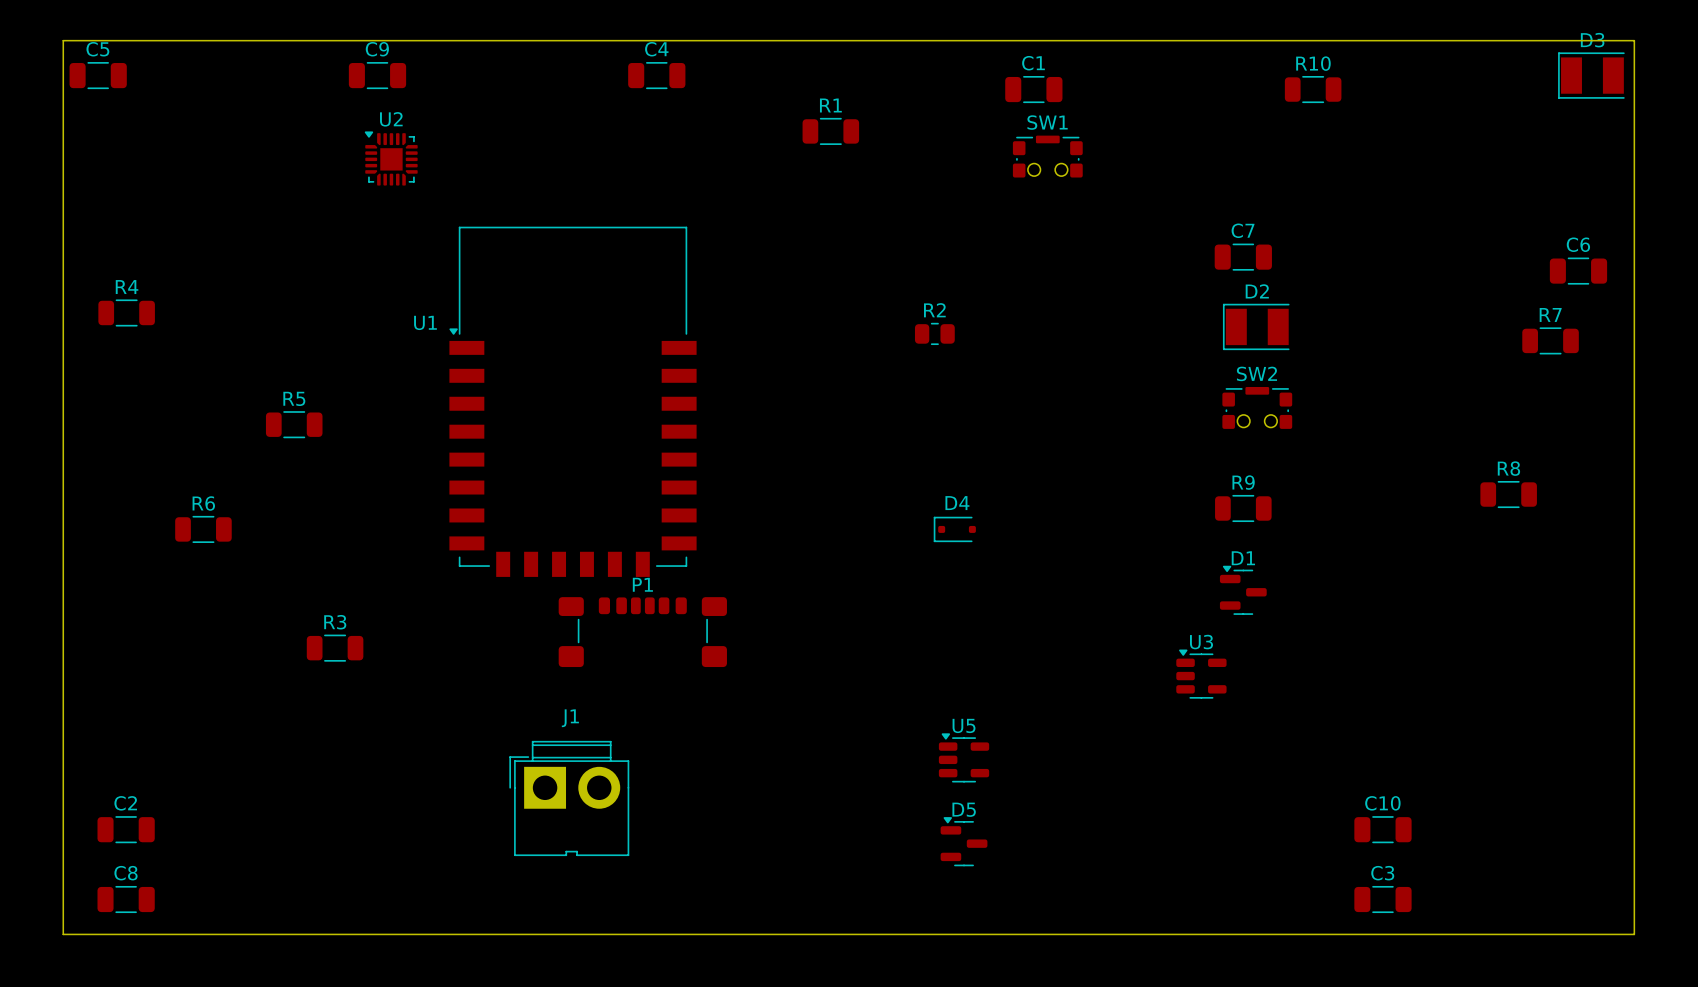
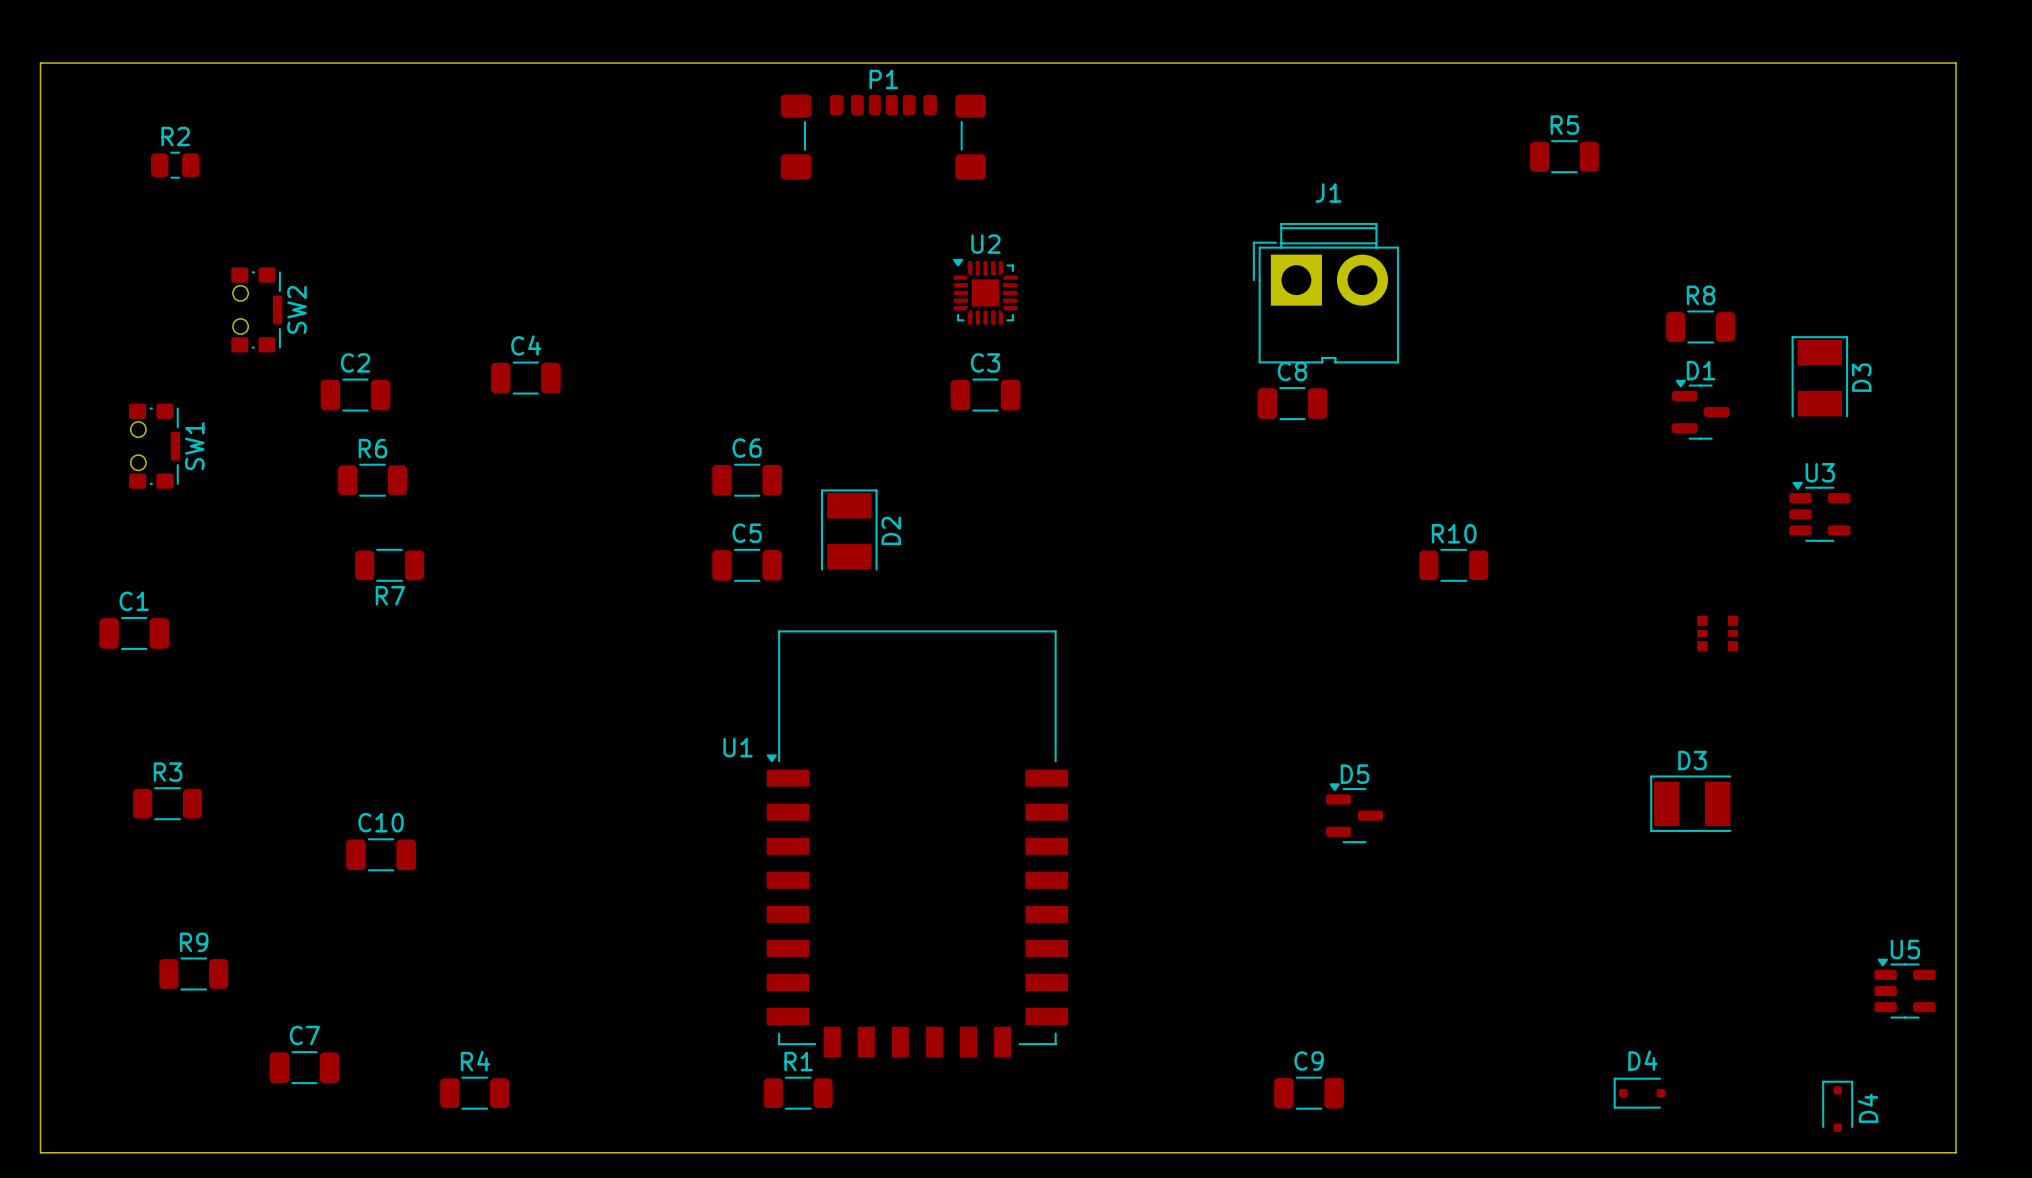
C5 position: (98, 75) -> (747, 565)
C9 position: (377, 75) -> (1309, 1093)
C4 position: (656, 75) -> (525, 378)
D3 rotation: 0° (1591, 75) -> 90° clockwise (1819, 376)
D3 position: (1591, 75) -> (1819, 376)
C1 position: (1033, 89) -> (134, 633)
R10 position: (1313, 89) -> (1453, 565)
R1 position: (830, 131) -> (798, 1093)
SW1 rotation: 0° (1047, 156) -> 90° clockwise (154, 446)
SW1 position: (1047, 156) -> (154, 446)
U2 position: (391, 158) -> (985, 291)
C7 position: (1243, 257) -> (304, 1067)
C6 position: (1578, 271) -> (747, 480)
R4 position: (126, 312) -> (474, 1093)
R7 name position: R7 (1550, 314) -> R7 (390, 595)
D2 rotation: 0° (1256, 326) -> 90° clockwise (849, 530)
D2 position: (1256, 326) -> (849, 530)
R2 position: (934, 333) -> (175, 165)
R7 position: (1550, 340) -> (389, 565)
U1 position: (573, 401) -> (917, 843)
SW2 rotation: 0° (1257, 407) -> 90° clockwise (256, 309)
SW2 position: (1257, 407) -> (256, 309)
R5 position: (294, 424) -> (1564, 156)
R8 position: (1508, 494) -> (1700, 326)
R9 position: (1243, 508) -> (193, 973)
part: none -> (1717, 633)
R6 position: (203, 529) -> (372, 480)
D4: (954, 529) -> none
D1 position: (1243, 590) -> (1700, 409)
P1 position: (642, 632) -> (883, 137)
R3 position: (335, 648) -> (167, 803)
D3: none -> (1690, 803)
U3 position: (1201, 674) -> (1819, 511)
U5 position: (964, 757) -> (1904, 988)
J1 position: (569, 798) -> (1325, 293)
C2 position: (126, 829) -> (355, 395)
C10 position: (1382, 829) -> (381, 854)
D5 position: (964, 841) -> (1354, 813)
D4: none -> (1639, 1093)
D4: none -> (1837, 1106)
C8 position: (126, 899) -> (1292, 403)
C3 position: (1382, 899) -> (985, 395)

